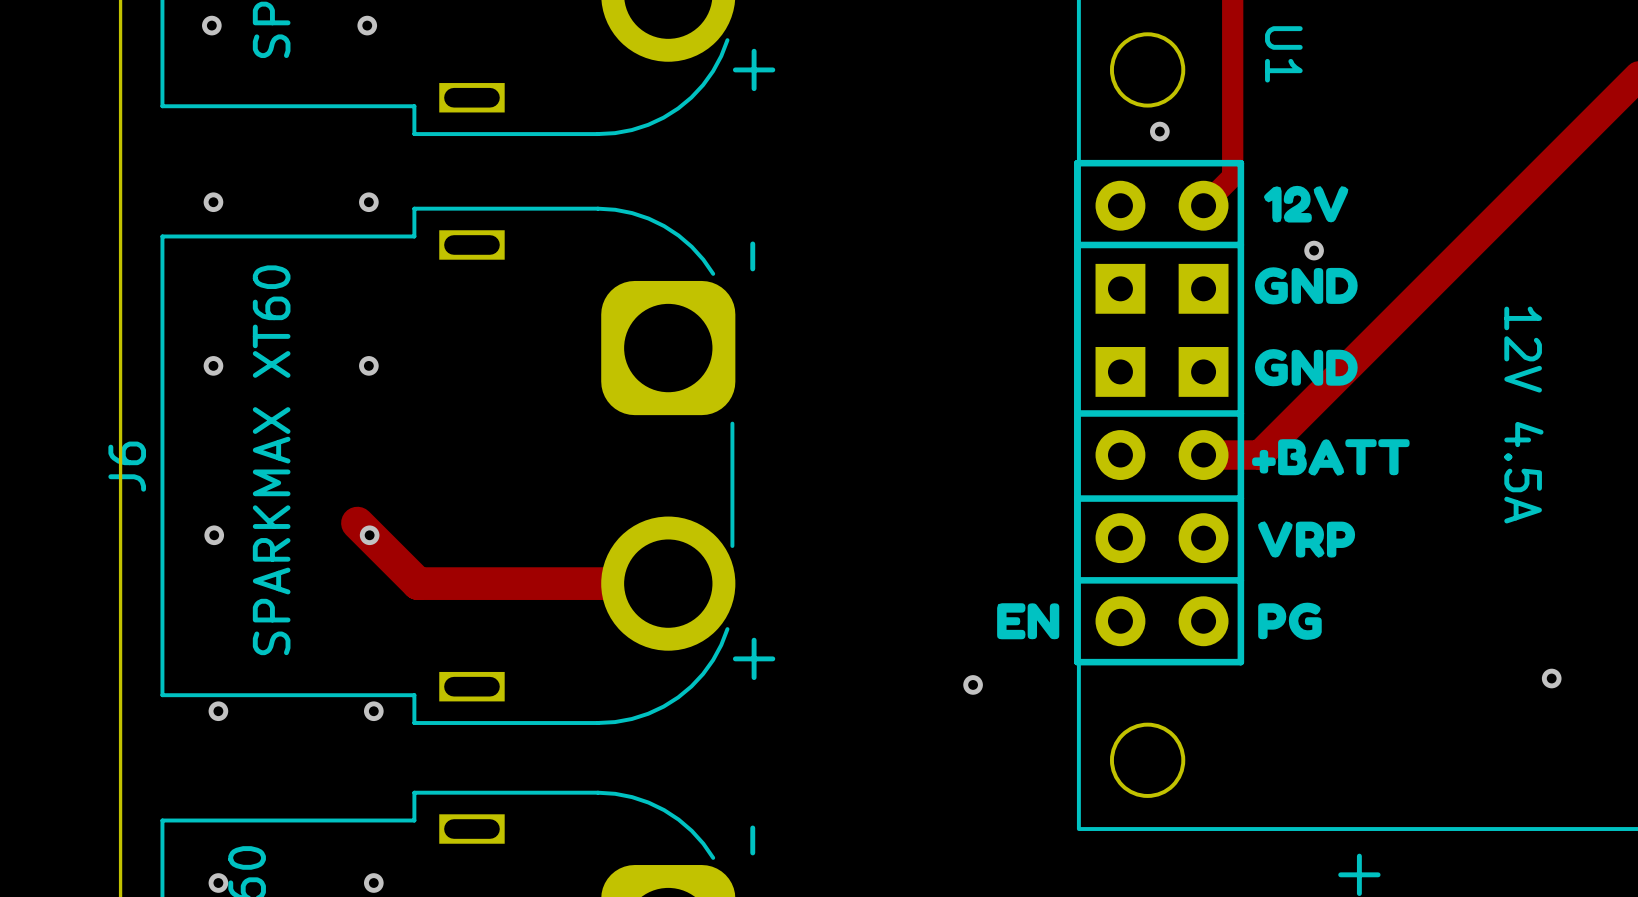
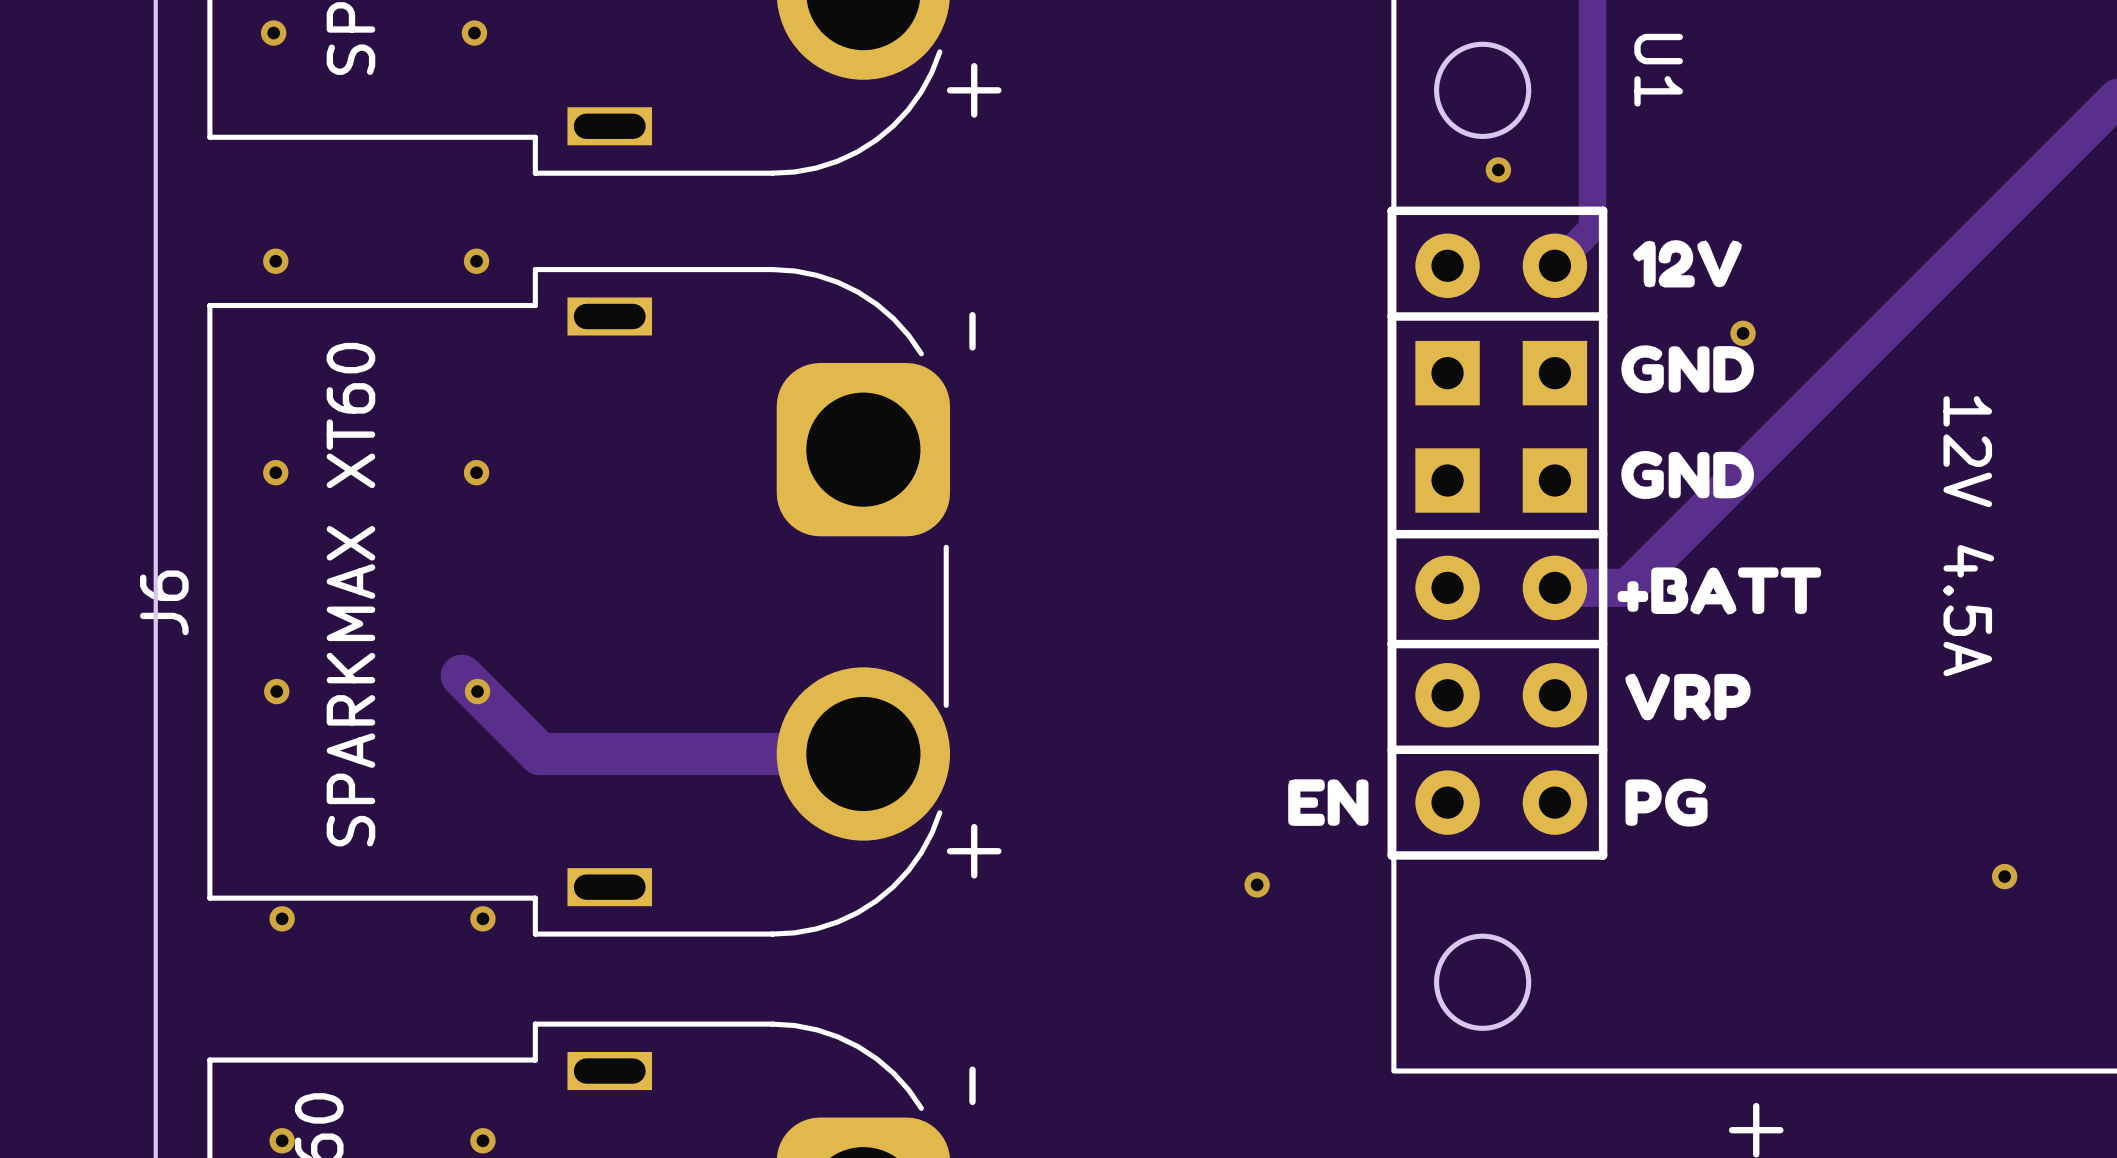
via position: (1314, 250) -> (1743, 333)

